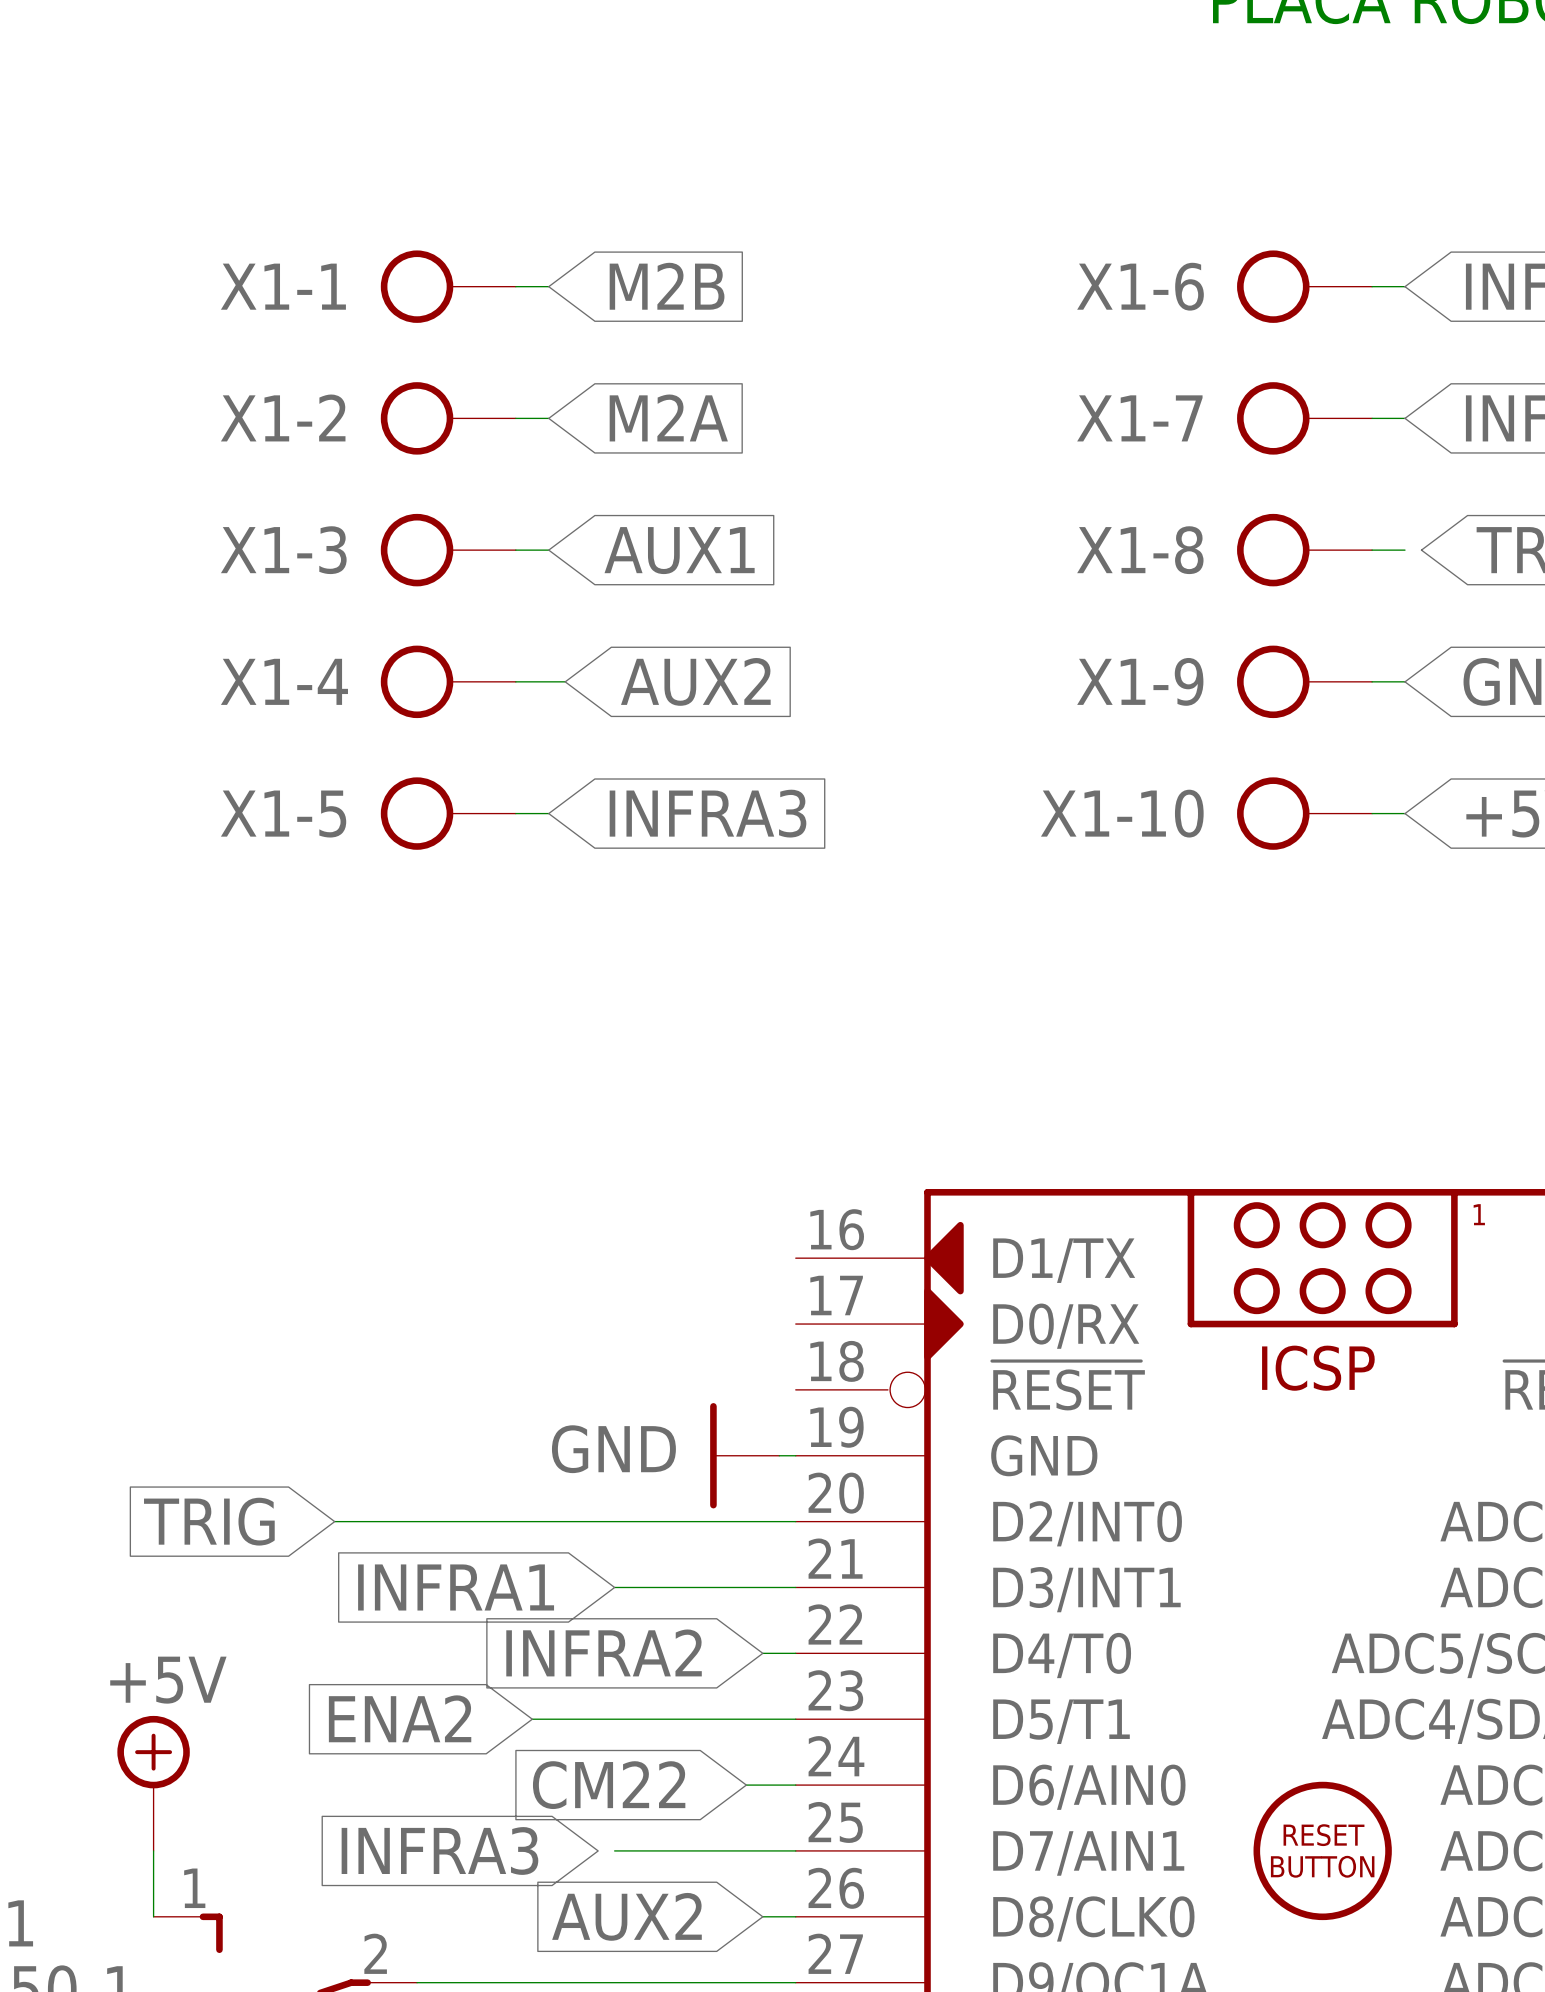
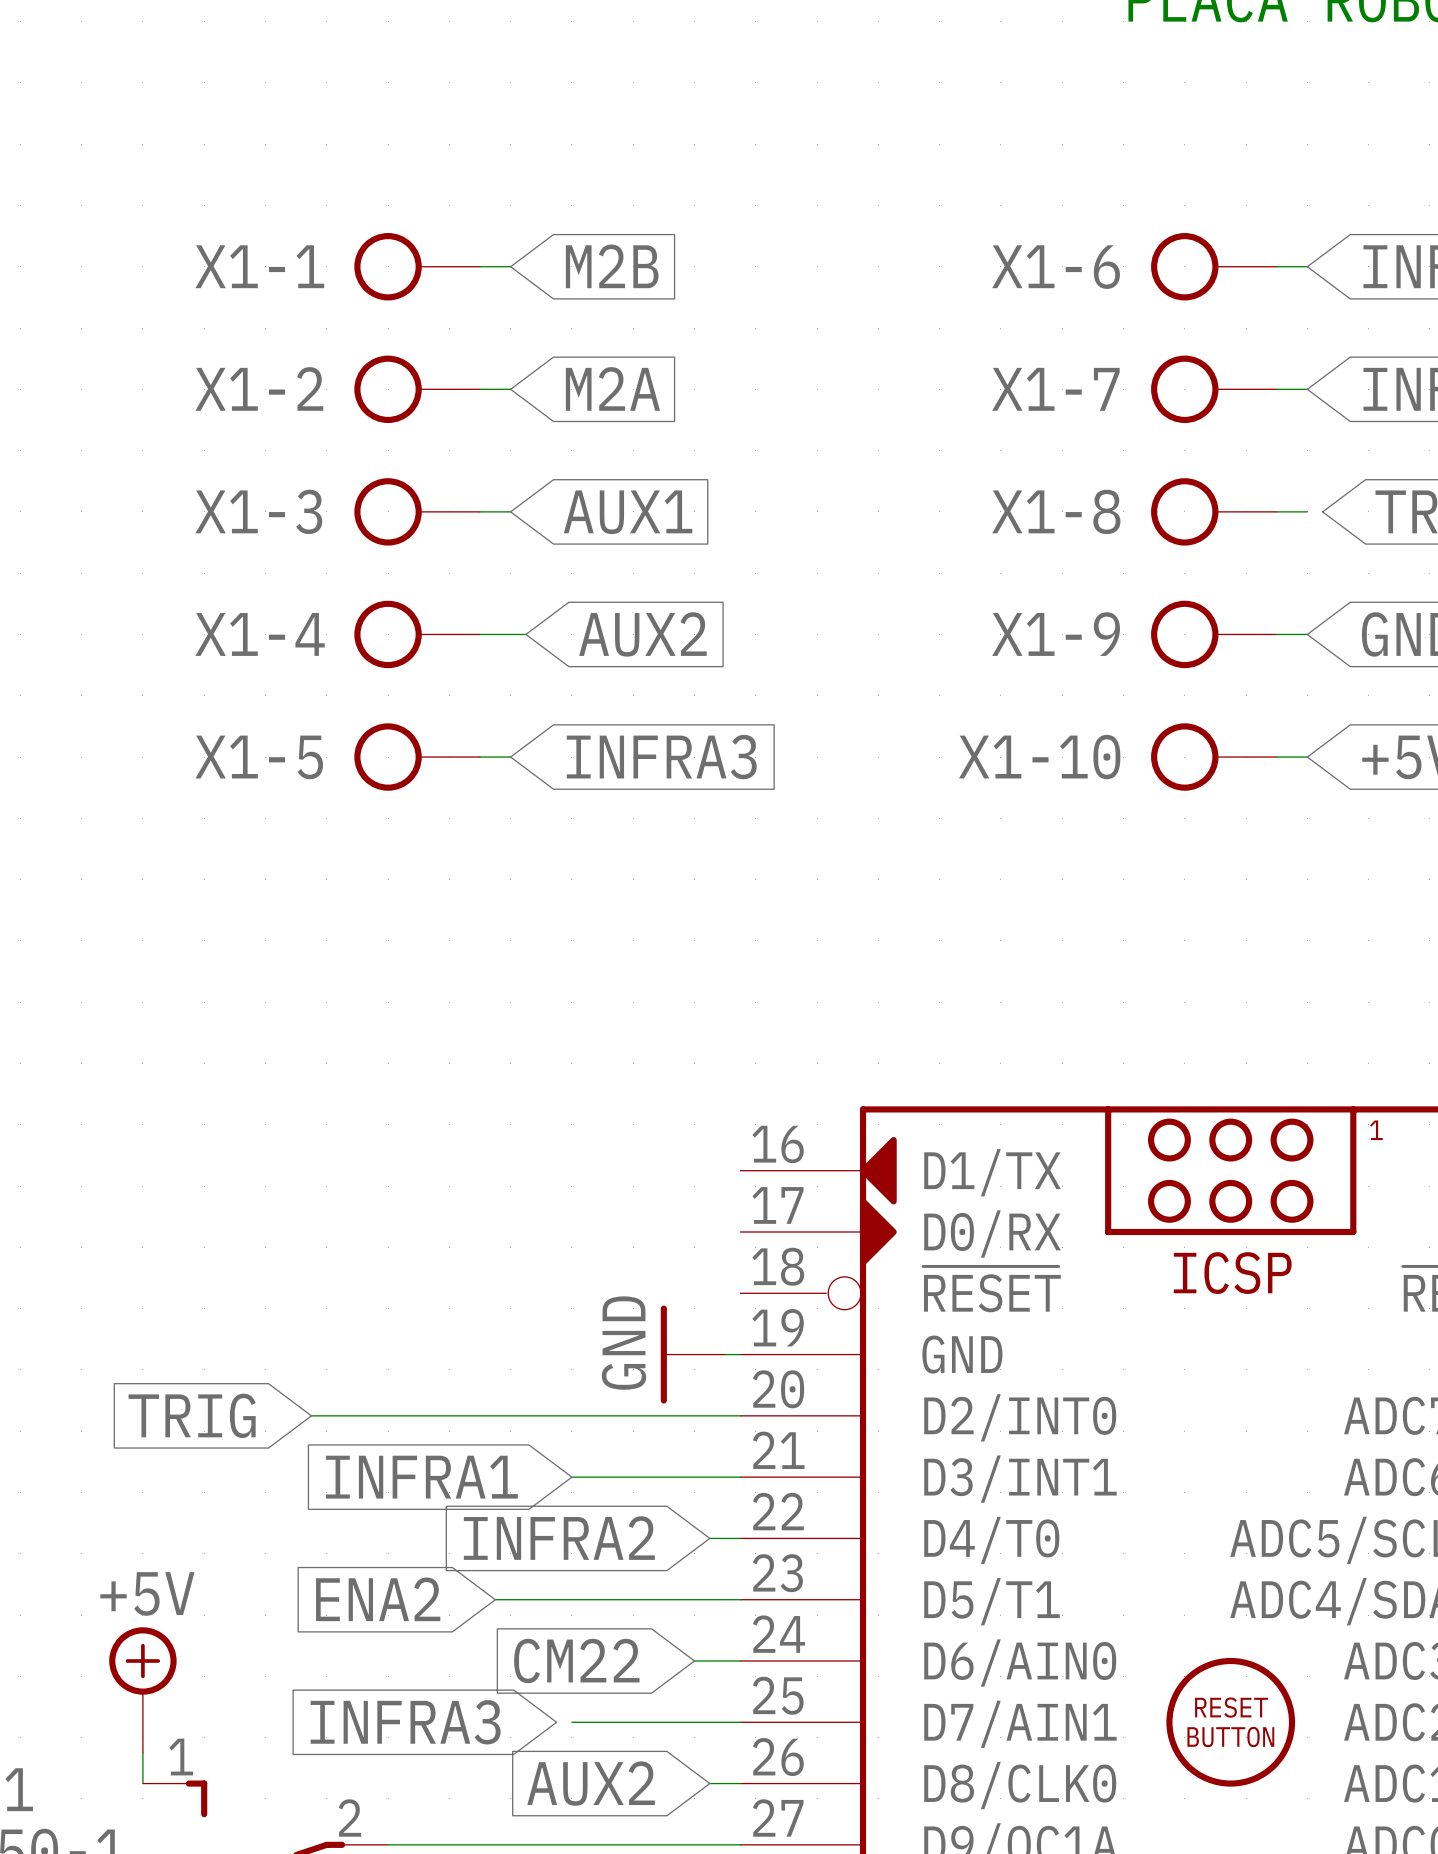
power symbol text rotation: 0° (613, 1449) -> 90° counterclockwise (624, 1343)
power symbol position: +5V (153, 1783) -> +5V (142, 1690)

